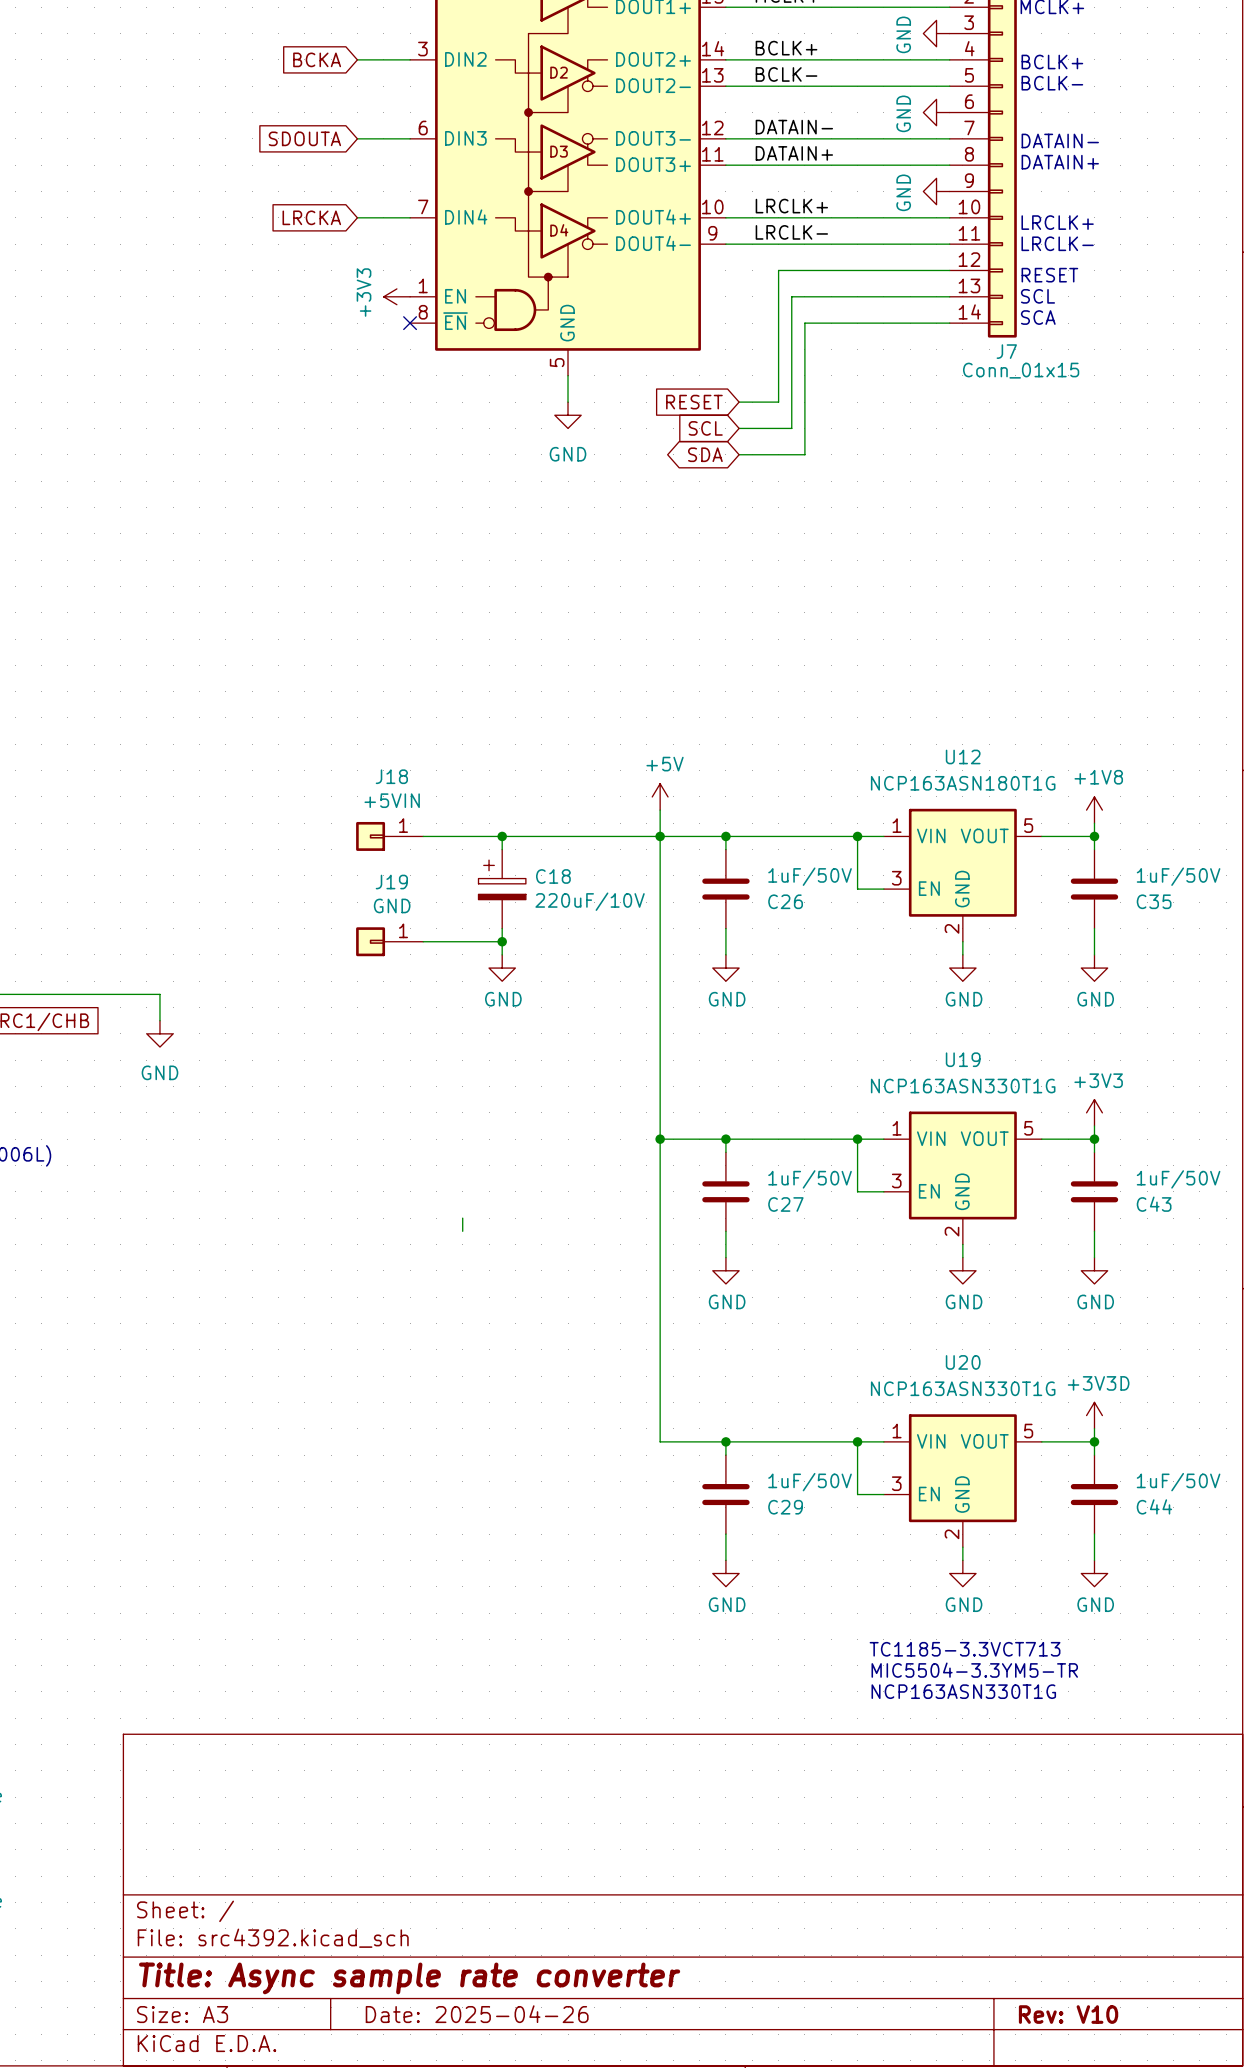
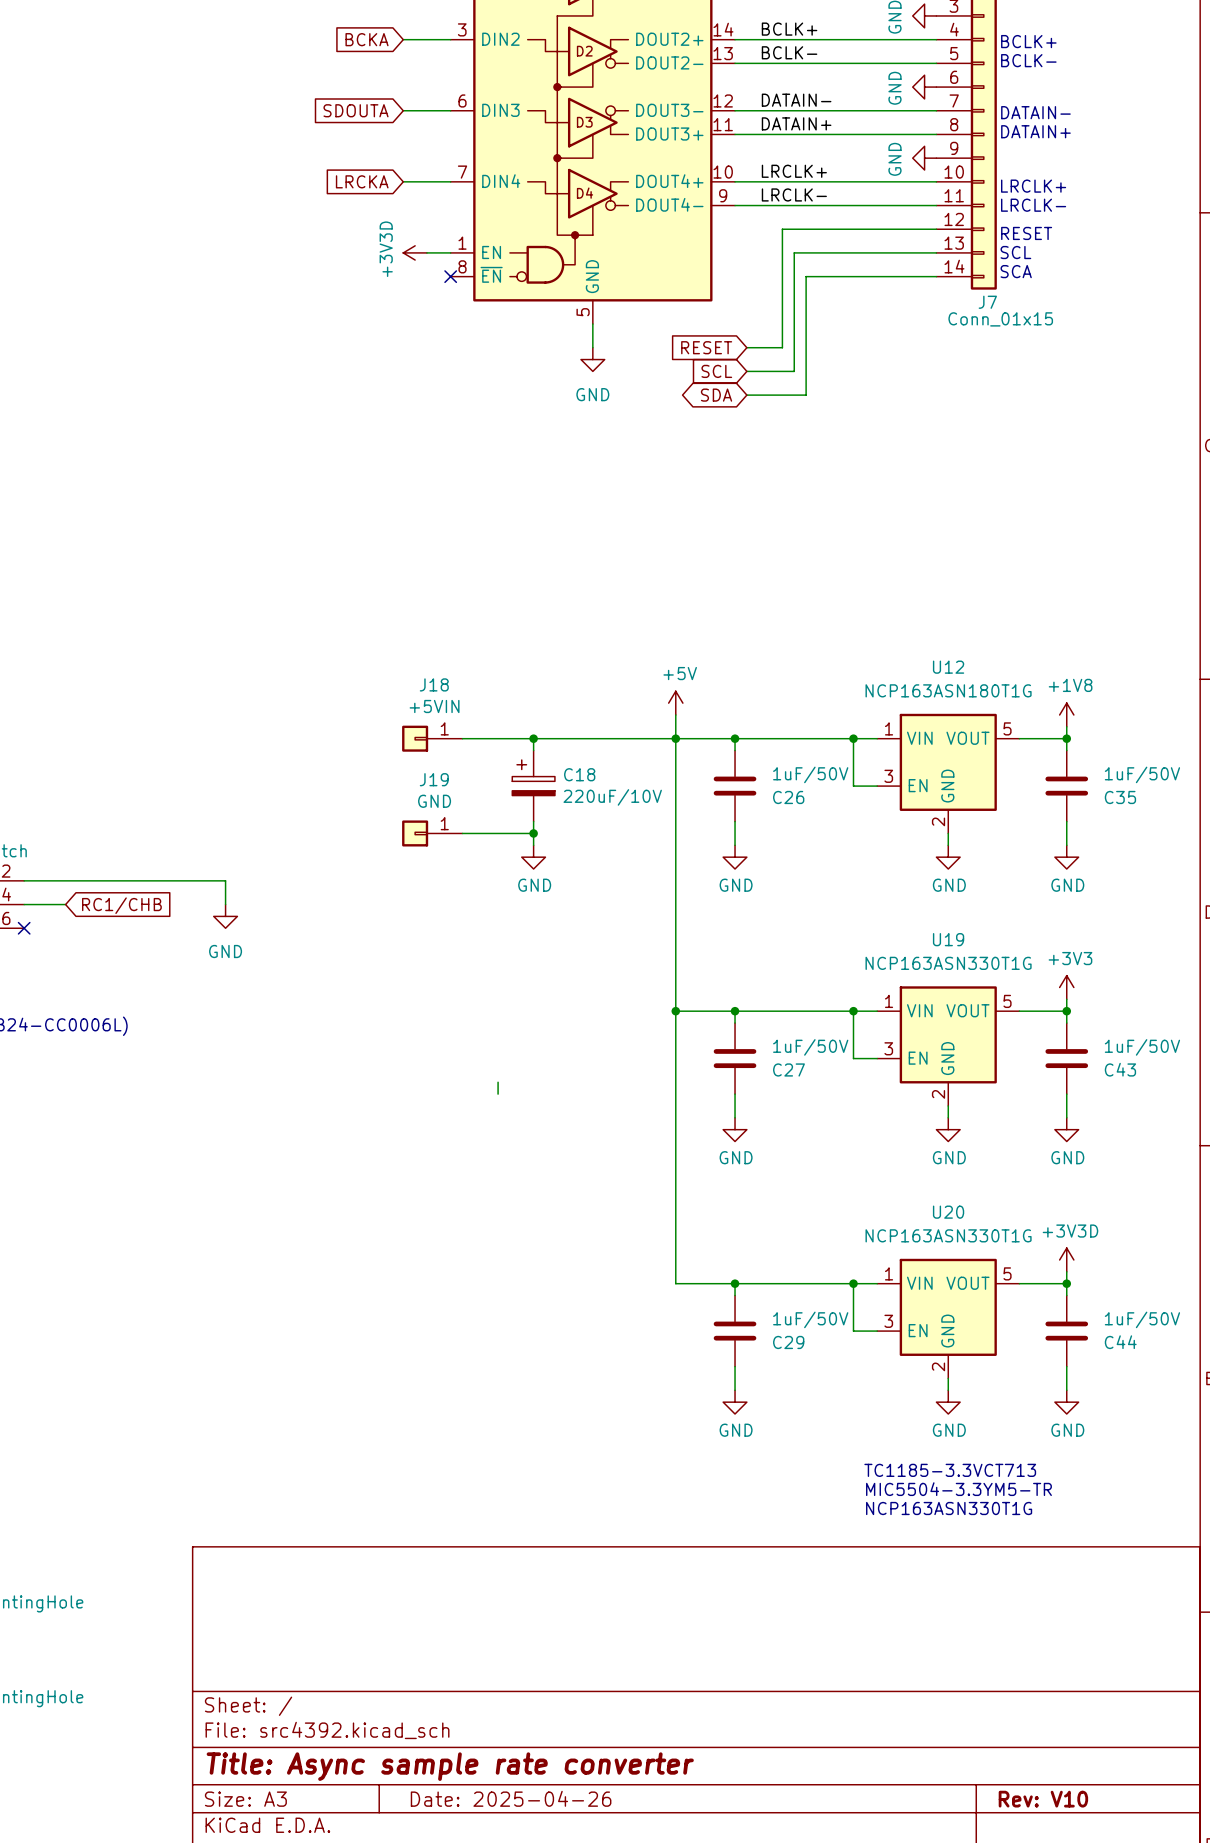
power symbol: none -> +3V3D (415, 252)
power symbol: +3V3 (396, 296) -> none

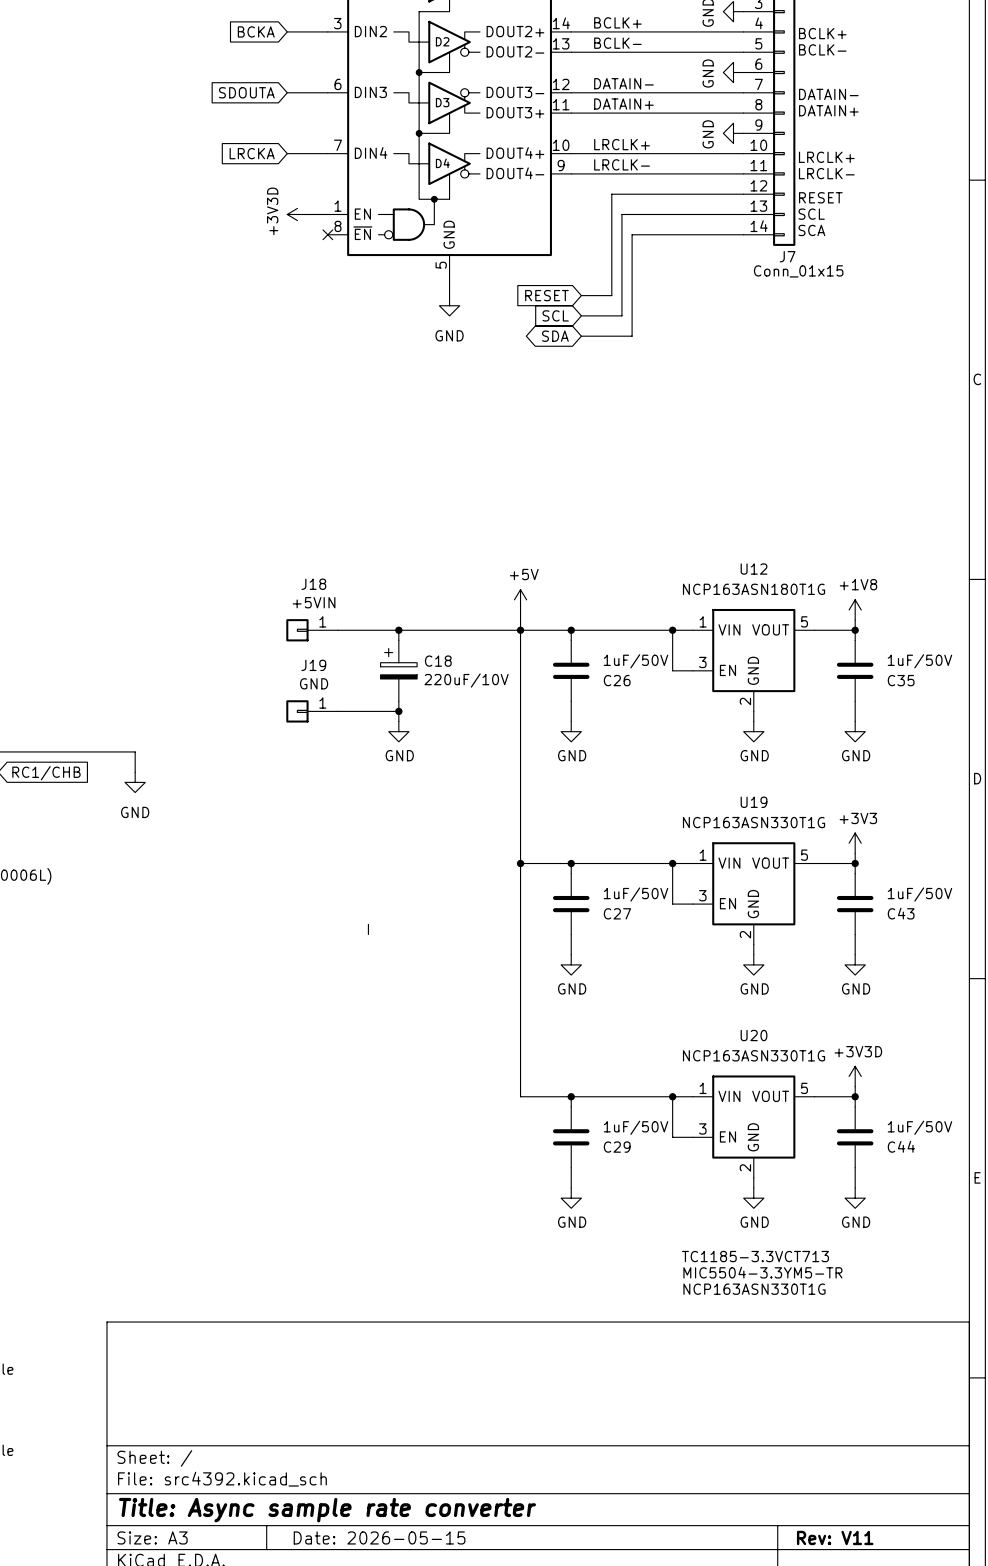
title block: Date: 2025-04-26 (511, 1798) -> Date: 2026-05-15 (379, 1537)
title block: Rev: V10 (1043, 1799) -> Rev: V11 (835, 1537)

